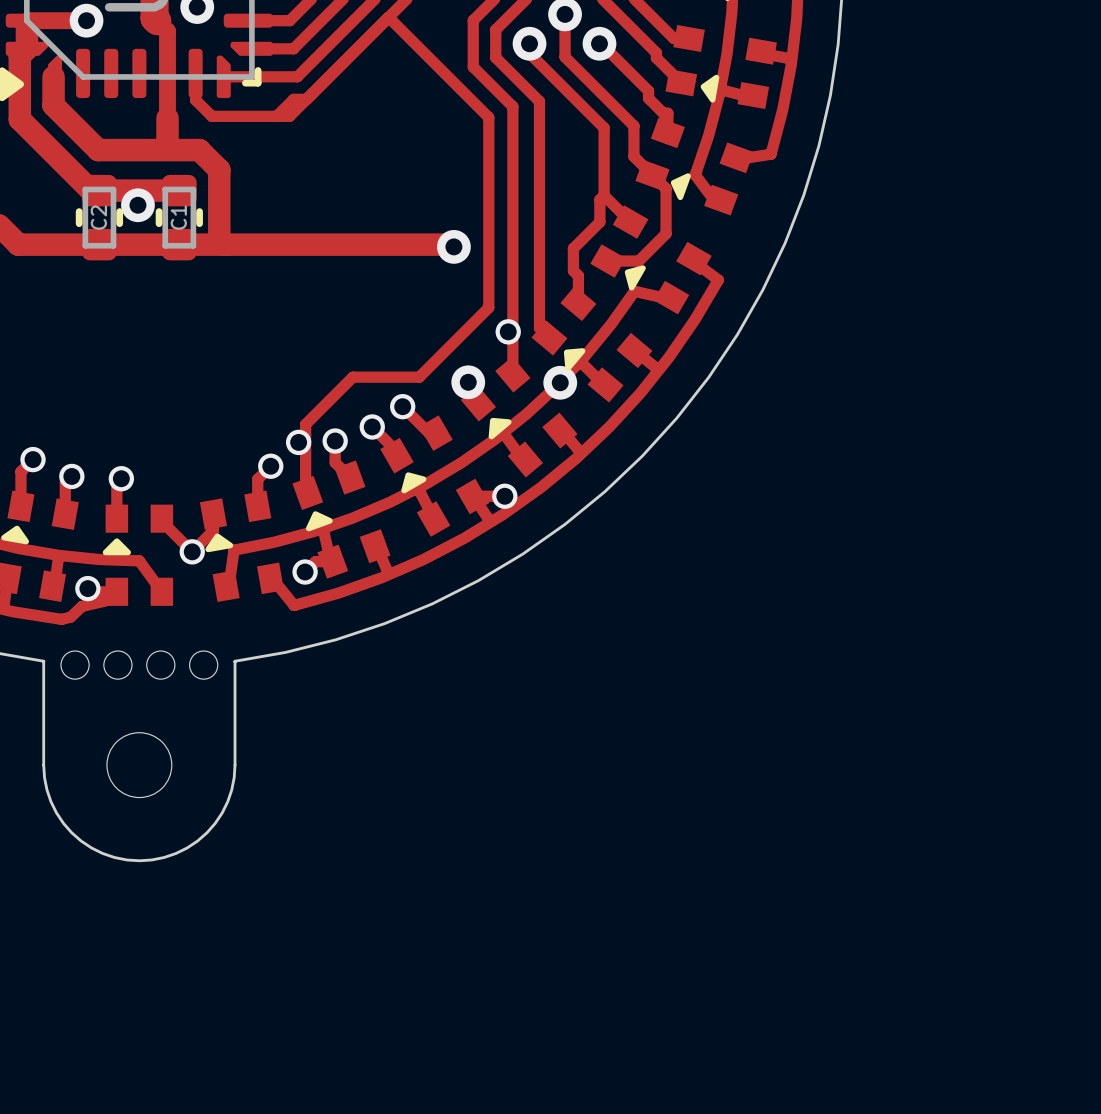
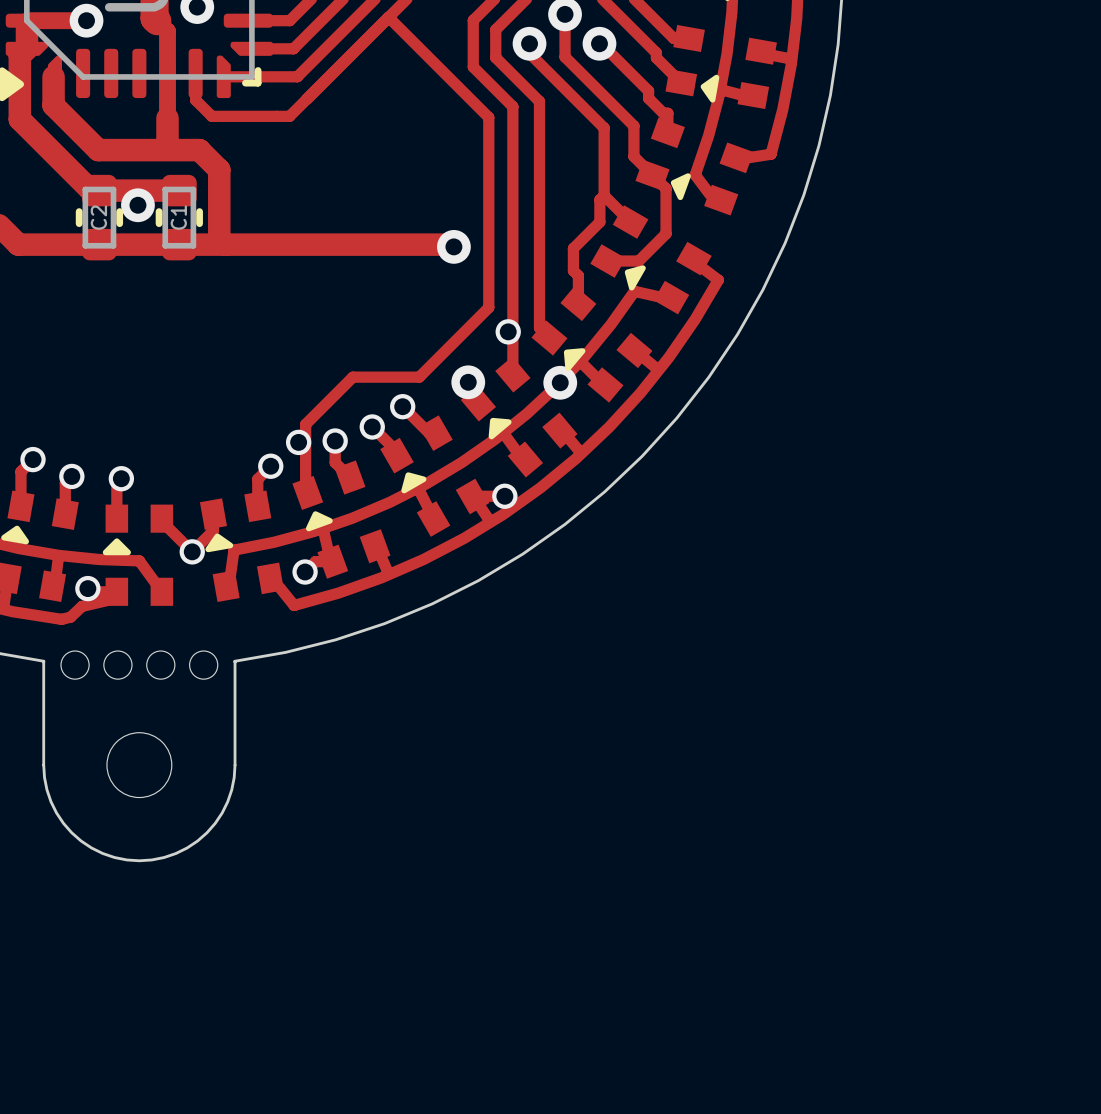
track: (306, 99) (293, 99) (276, 116) -> none

